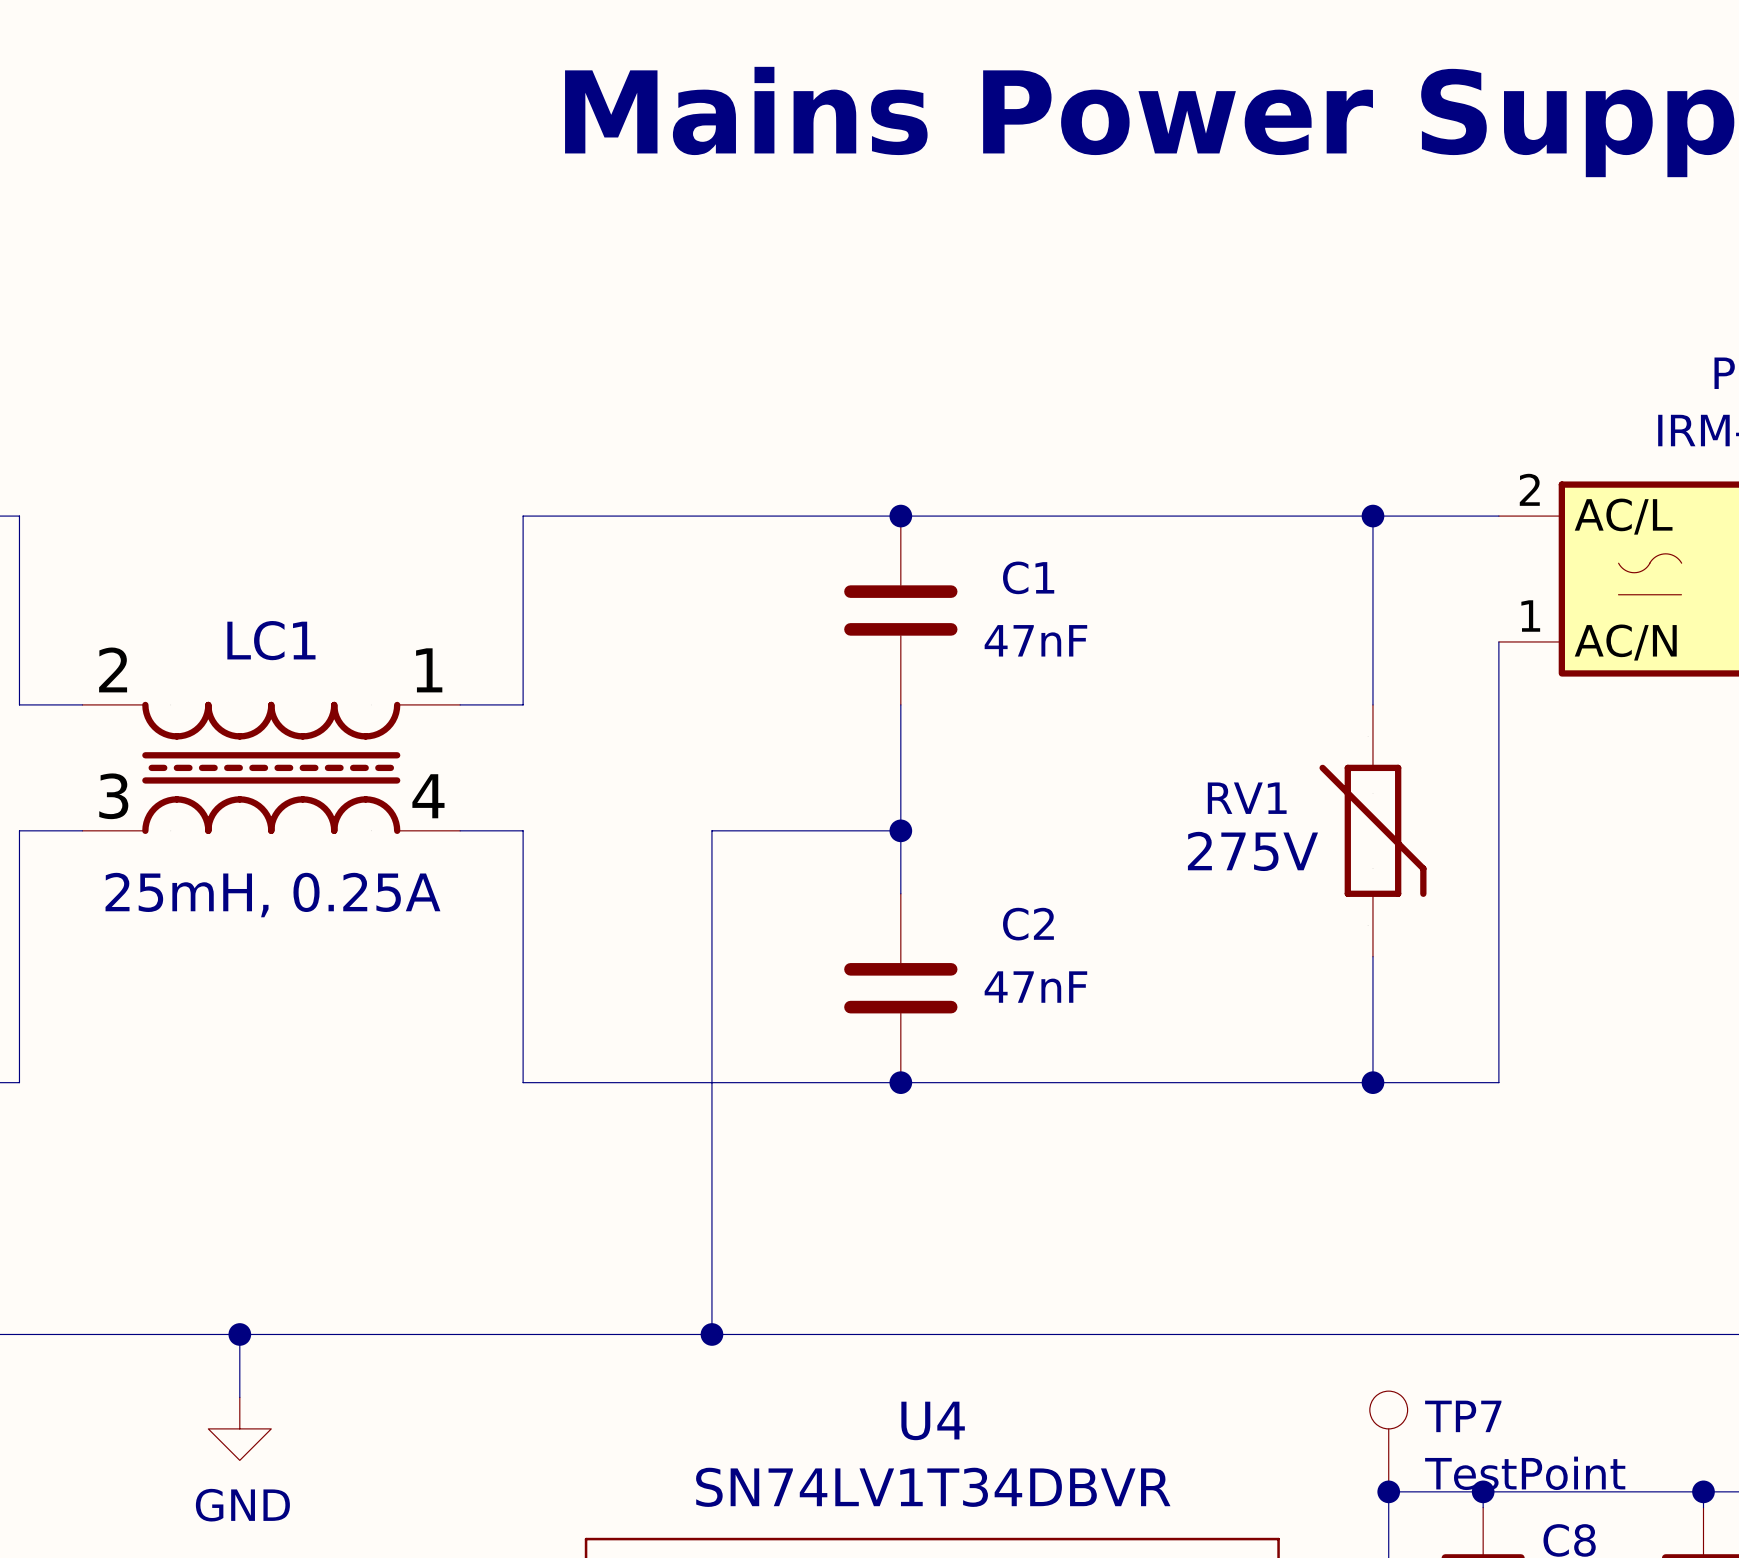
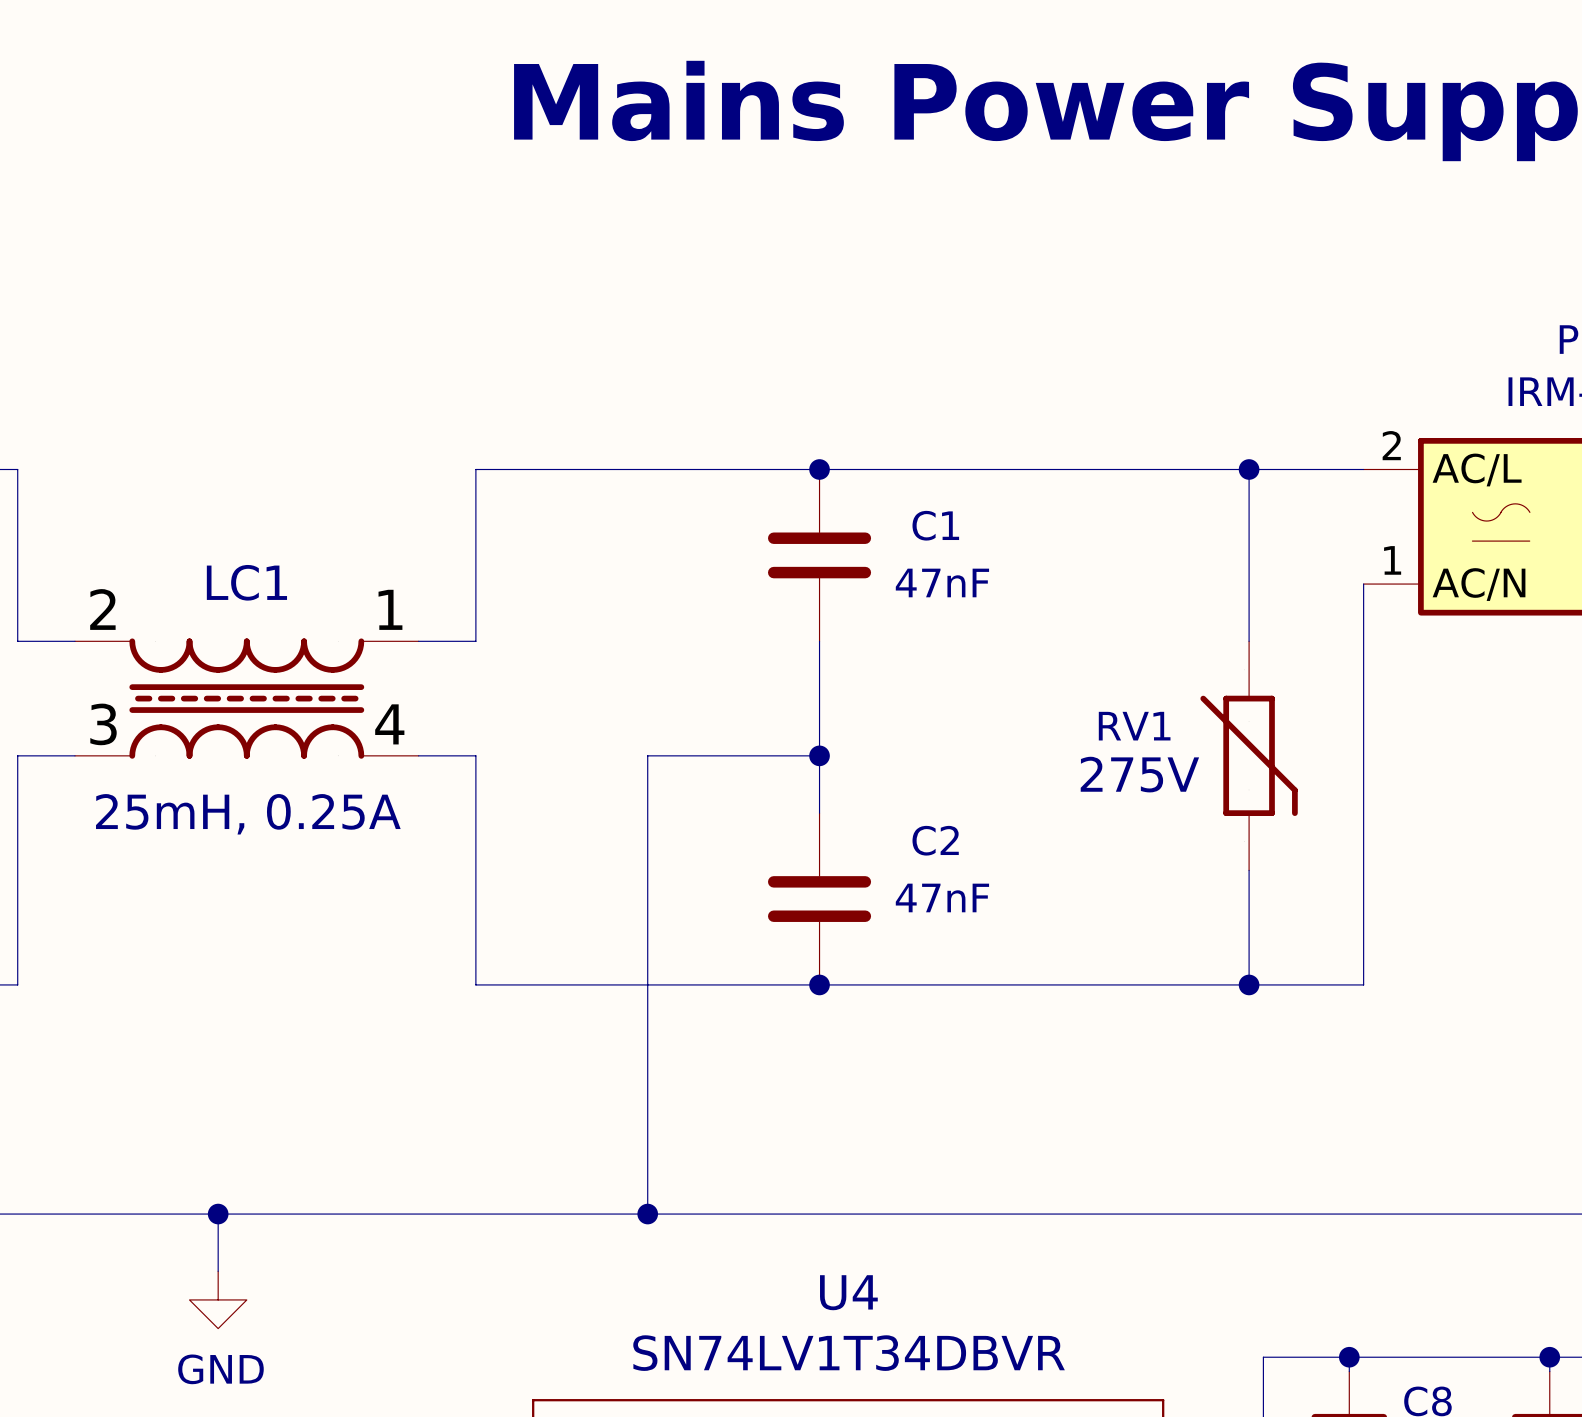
TP7: TestPoint (1388, 1441) -> none
junction: (1388, 1491) -> none

